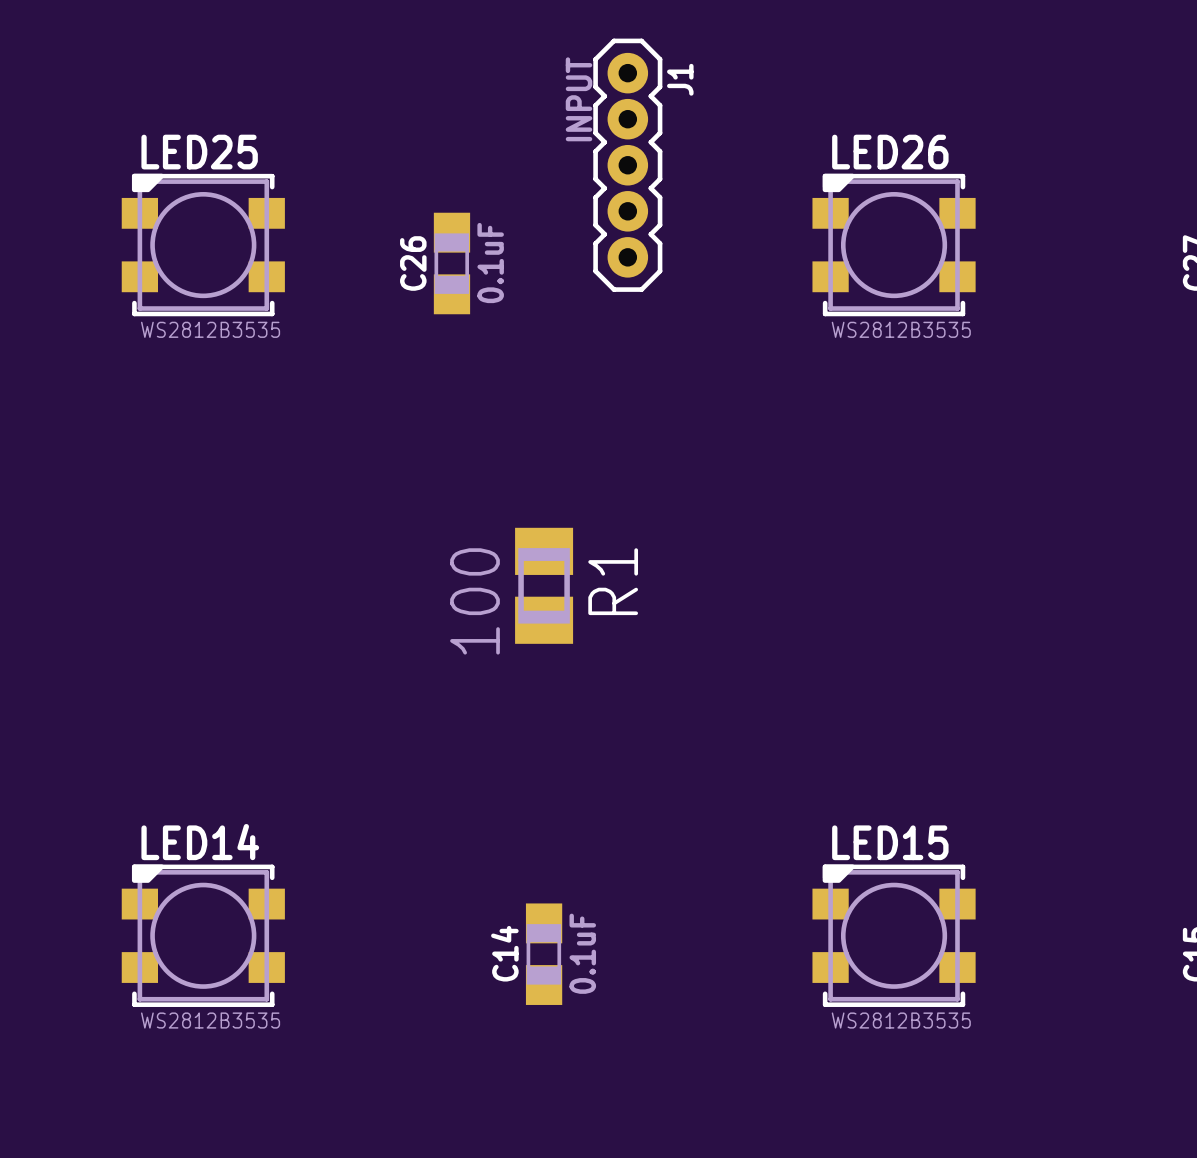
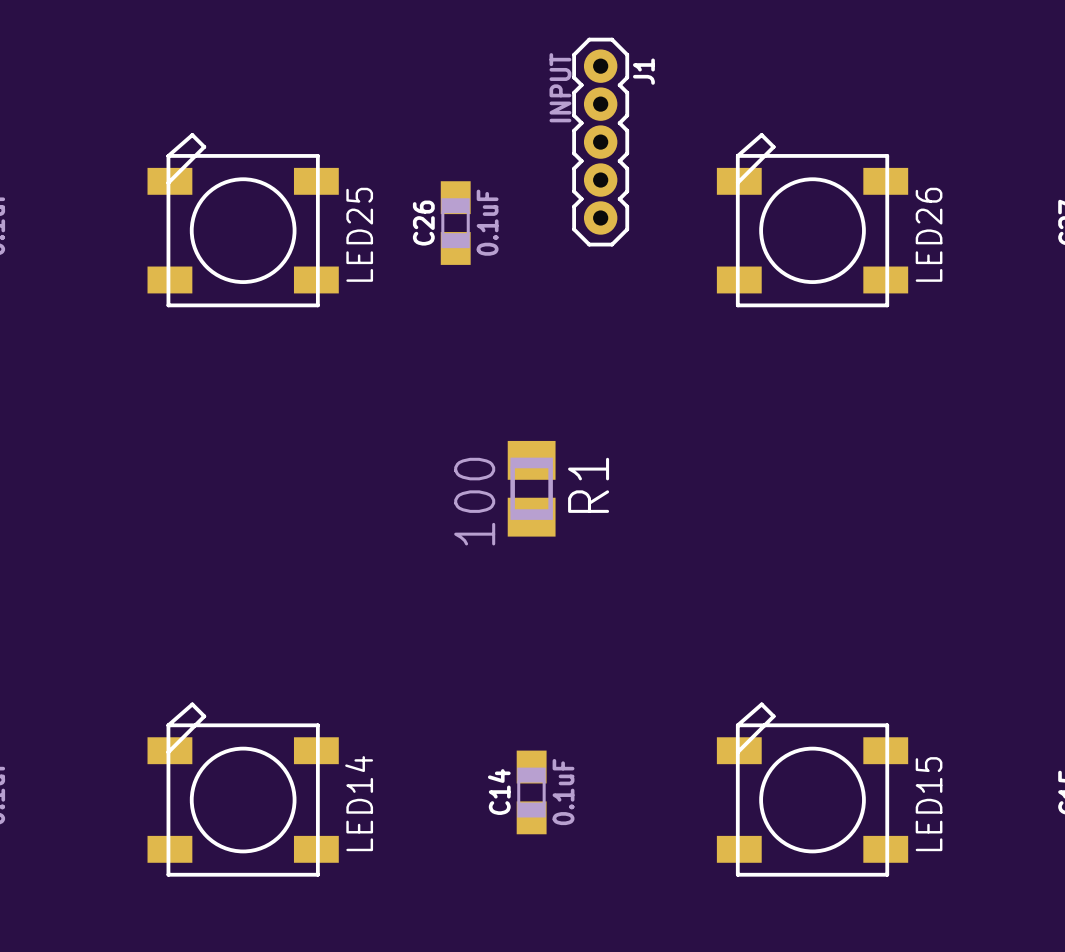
LED25 name position: LED25 (199, 152) -> LED25 (359, 234)
LED26 name position: LED26 (890, 152) -> LED26 (929, 234)
LED25 footprint: [121, 173, 285, 317] -> [147, 133, 339, 308]
LED26 footprint: [812, 173, 976, 317] -> [716, 133, 909, 308]
LED25 value: WS2812B3535 (210, 329) -> none
LED26 value: WS2812B3535 (901, 329) -> none
LED14 name position: LED14 (200, 842) -> LED14 (359, 803)
LED15 name position: LED15 (890, 842) -> LED15 (929, 804)
LED14 footprint: [121, 864, 285, 1007] -> [147, 702, 339, 877]
LED15 footprint: [812, 864, 976, 1007] -> [716, 702, 909, 877]
LED14 value: WS2812B3535 (210, 1020) -> none
LED15 value: WS2812B3535 (901, 1020) -> none

